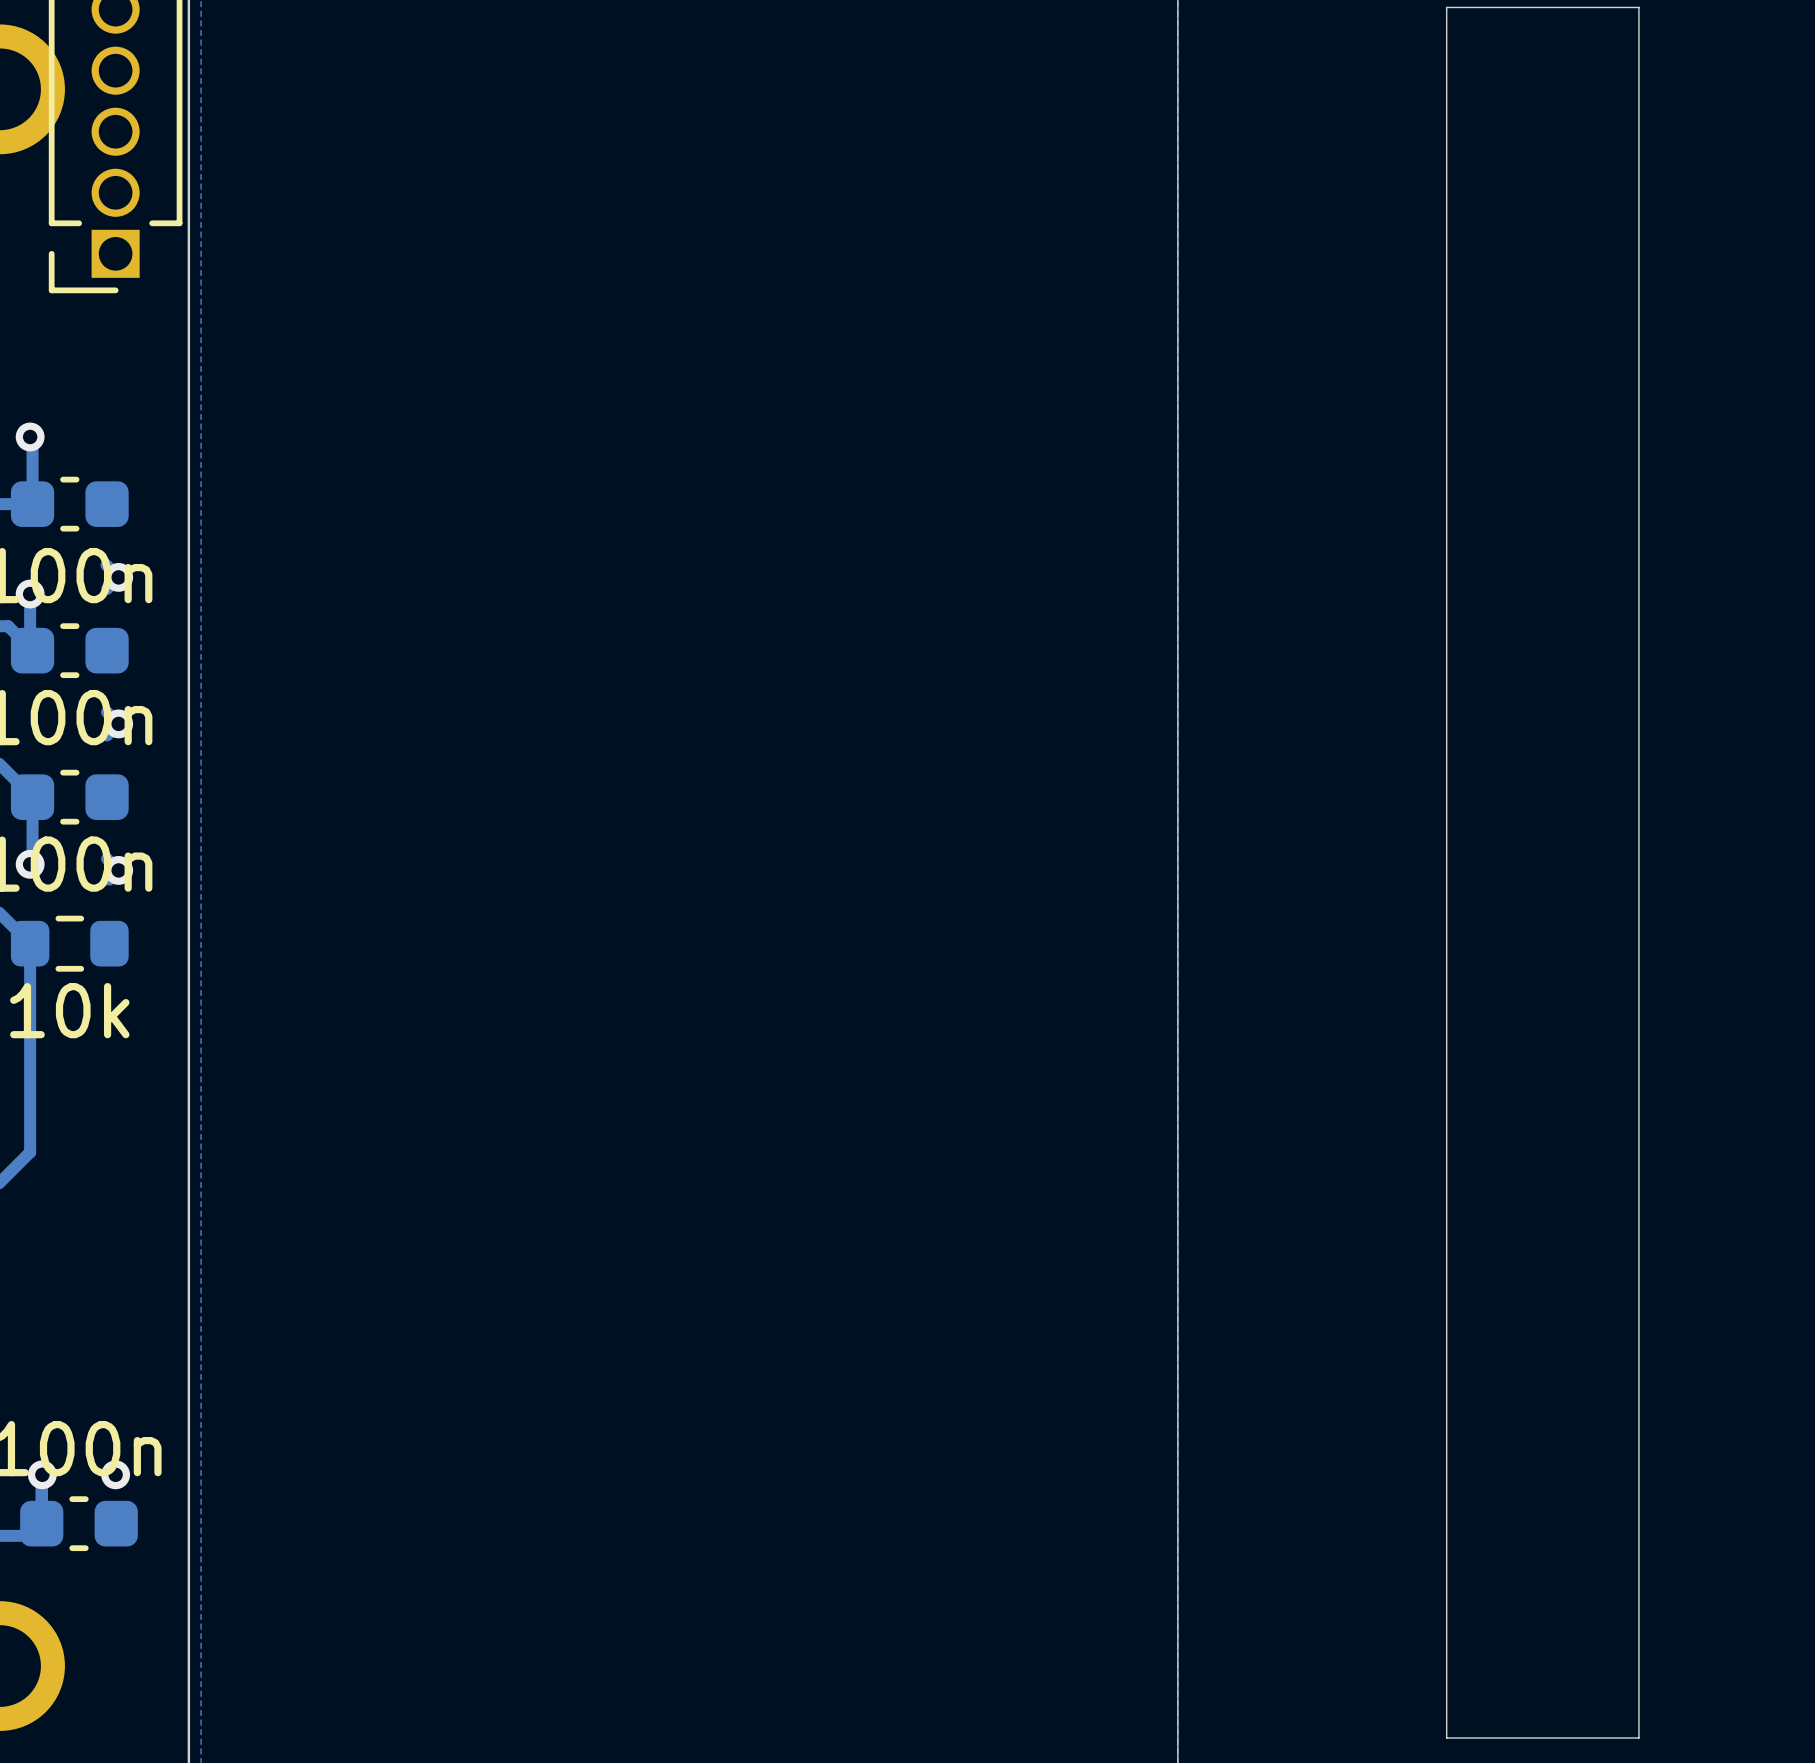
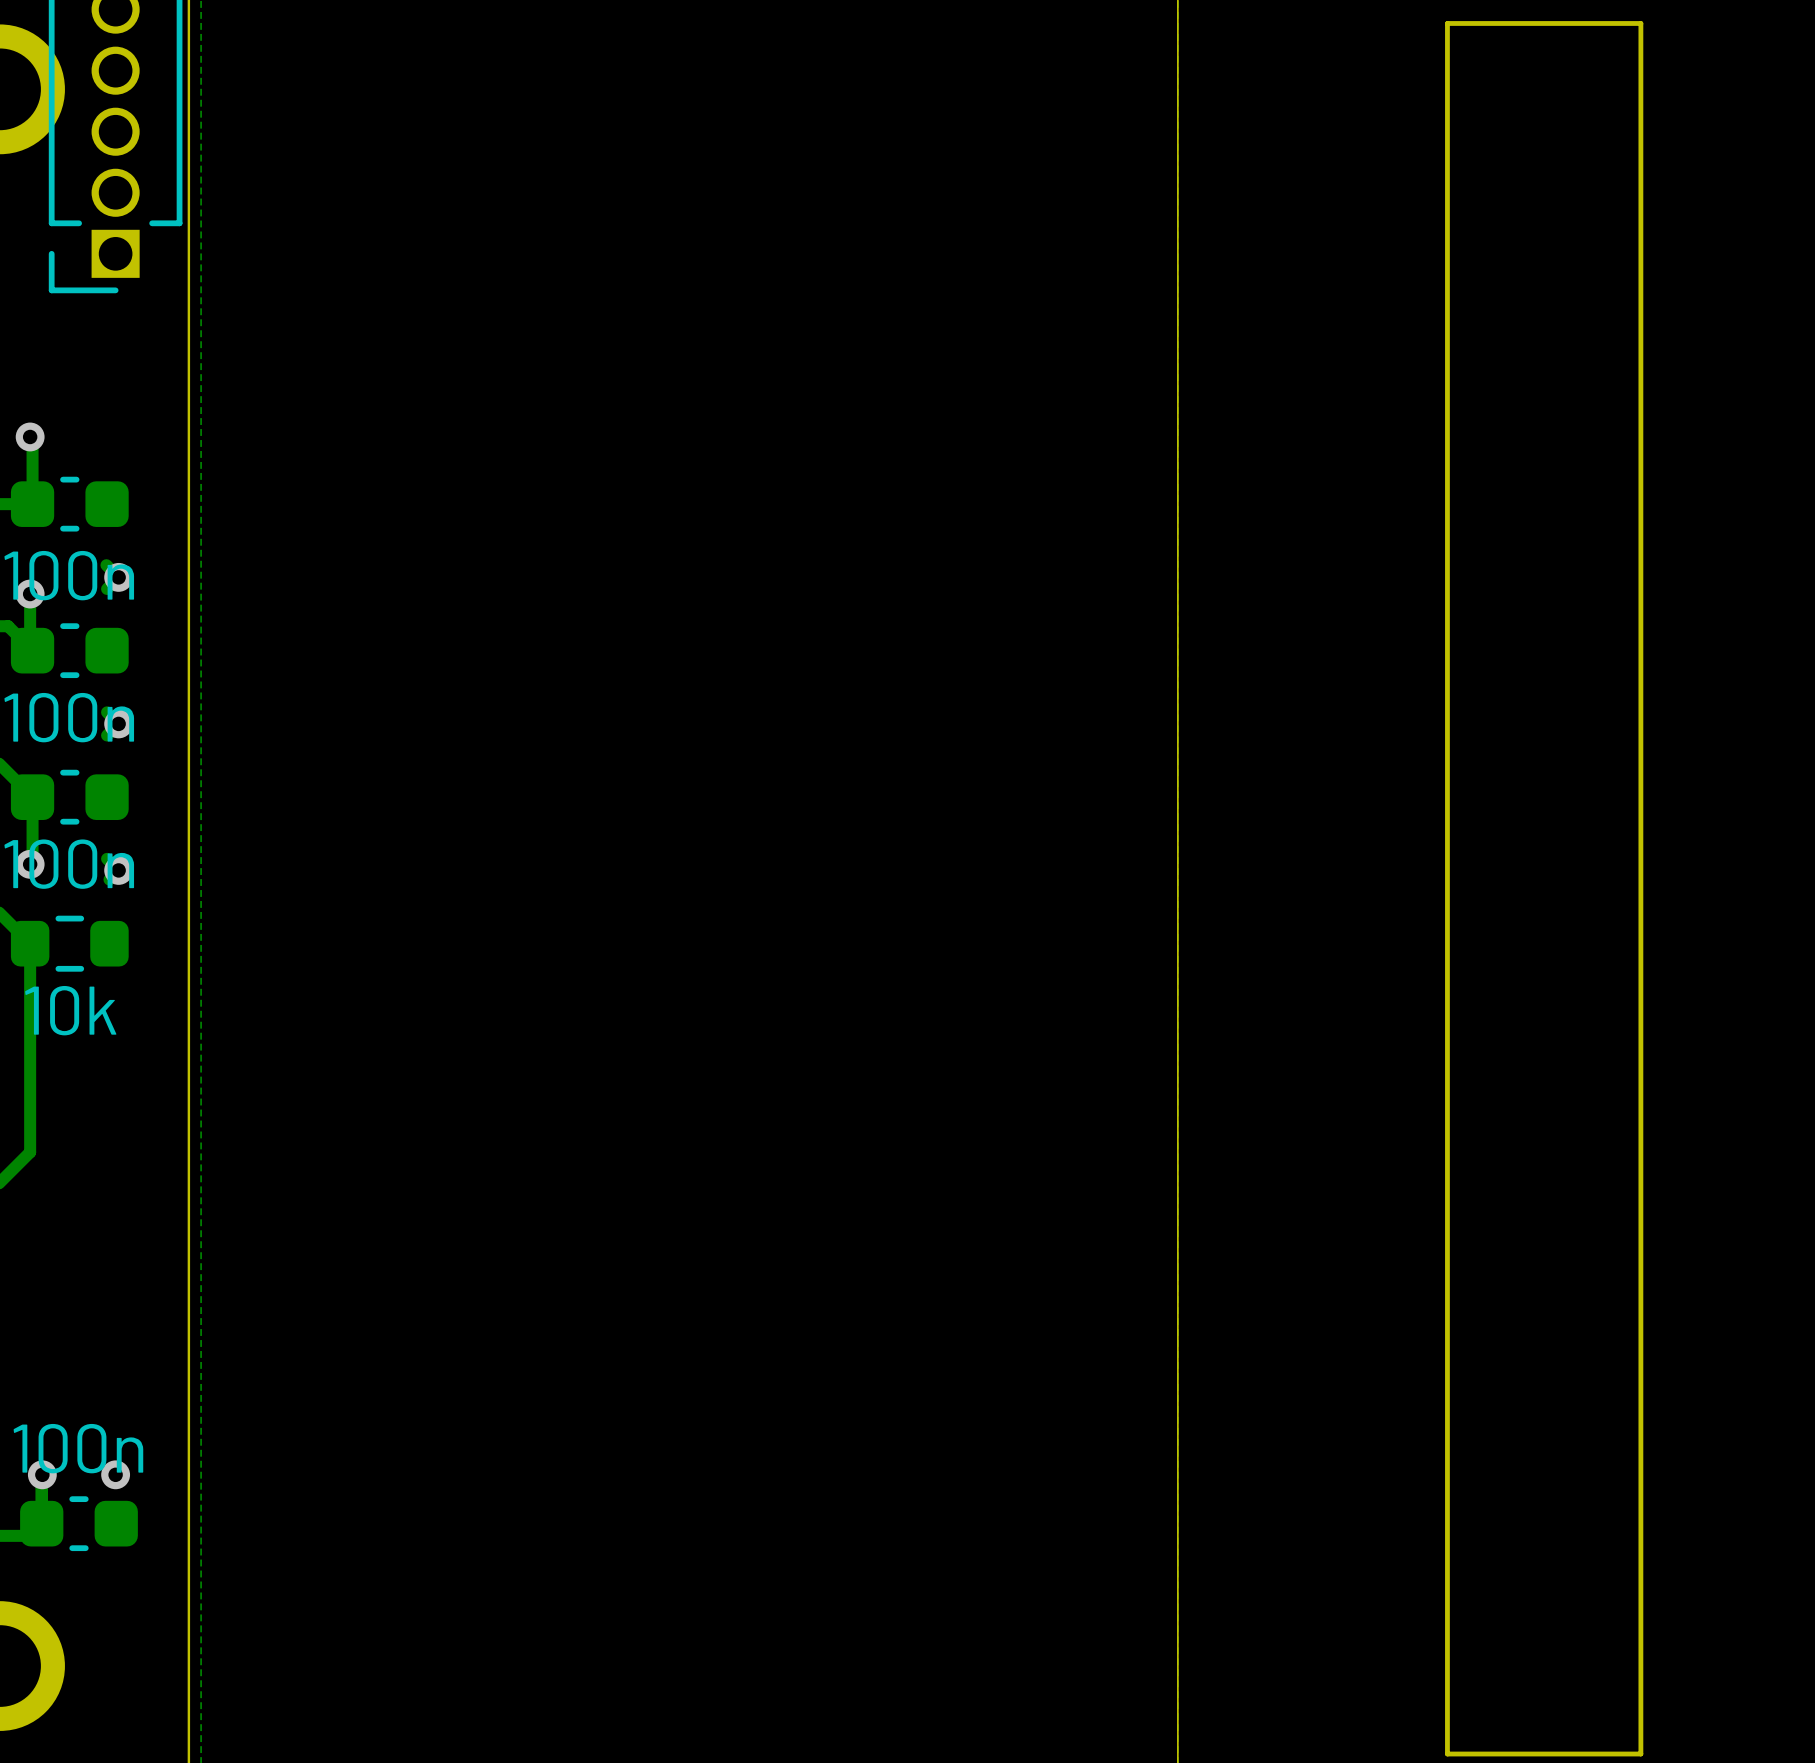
board edge: (1638, 7) (1446, 7) (1446, 1737) (1638, 1737) (1638, 7) -> (1640, 23) (1640, 1754) (1447, 1754) (1447, 23) (1640, 23)

